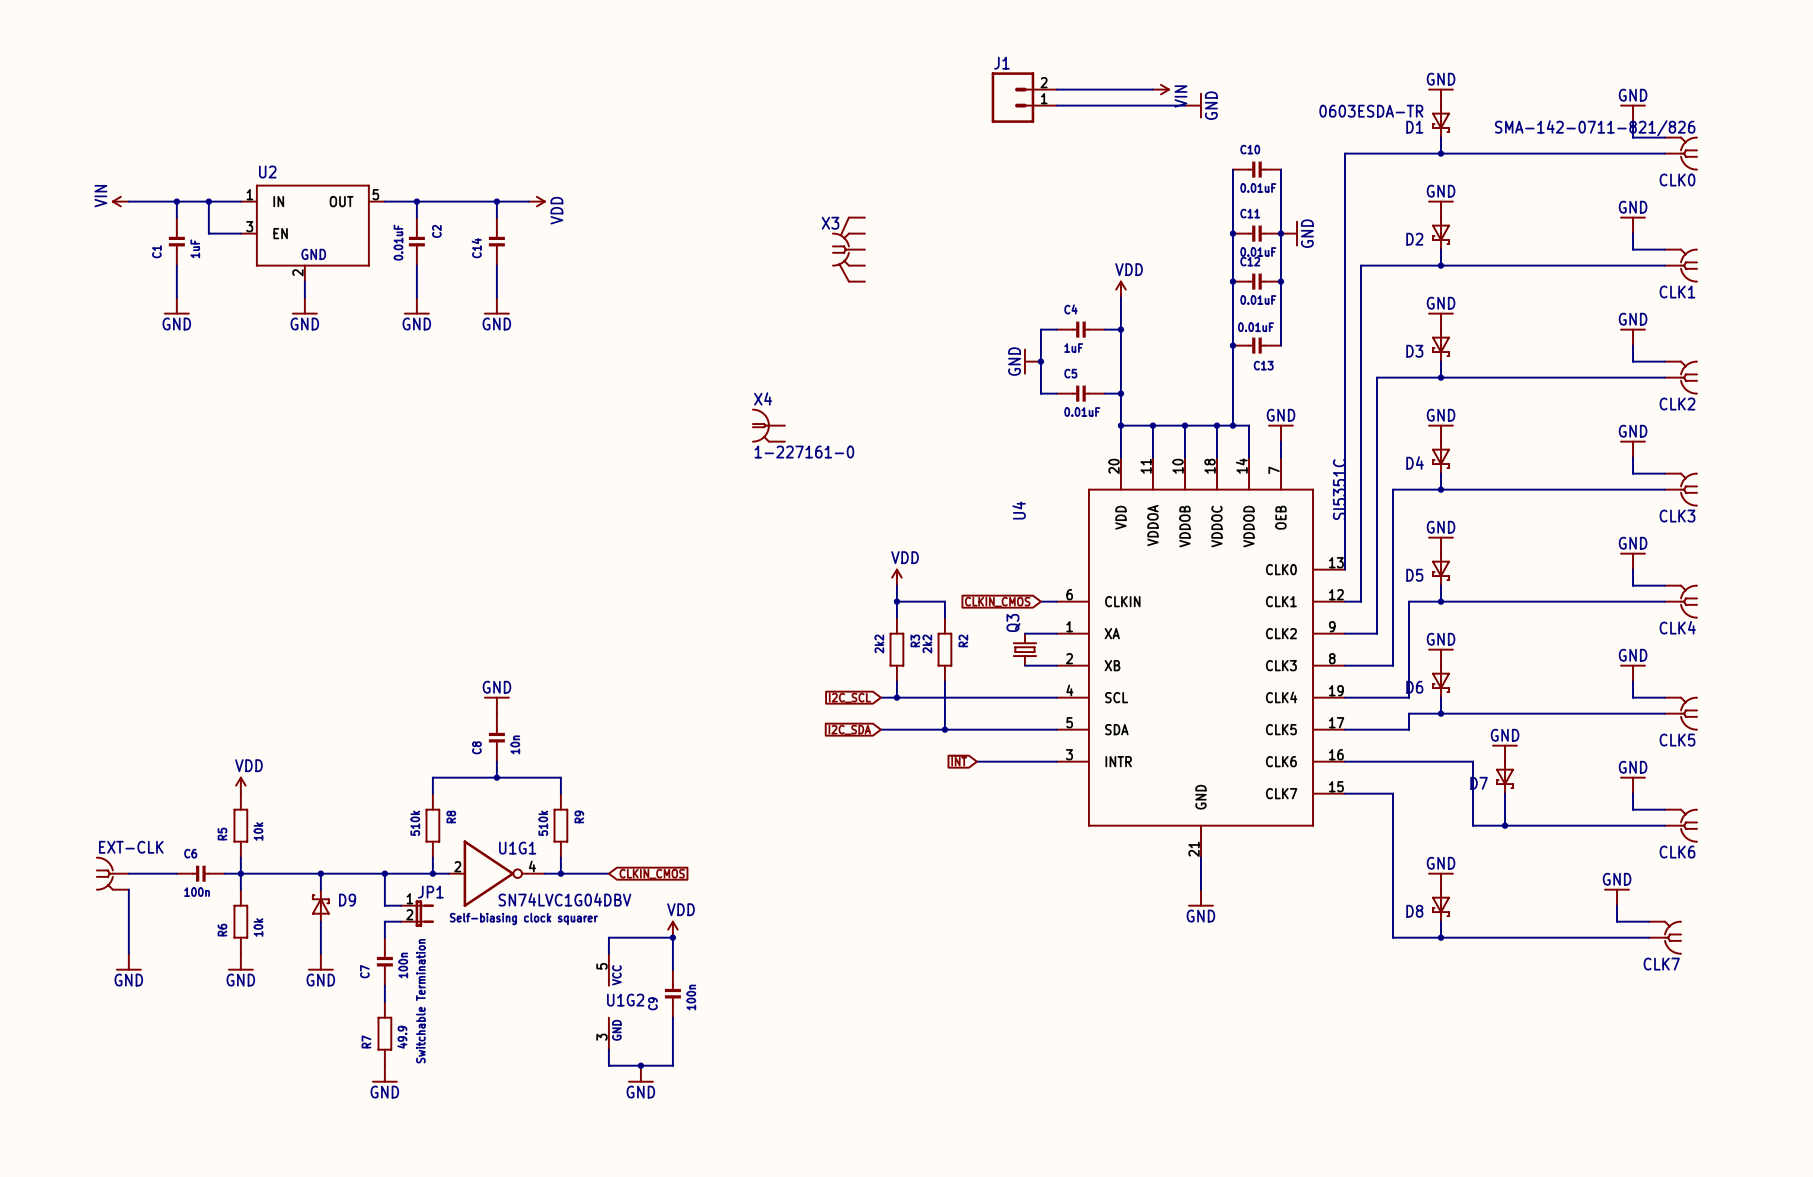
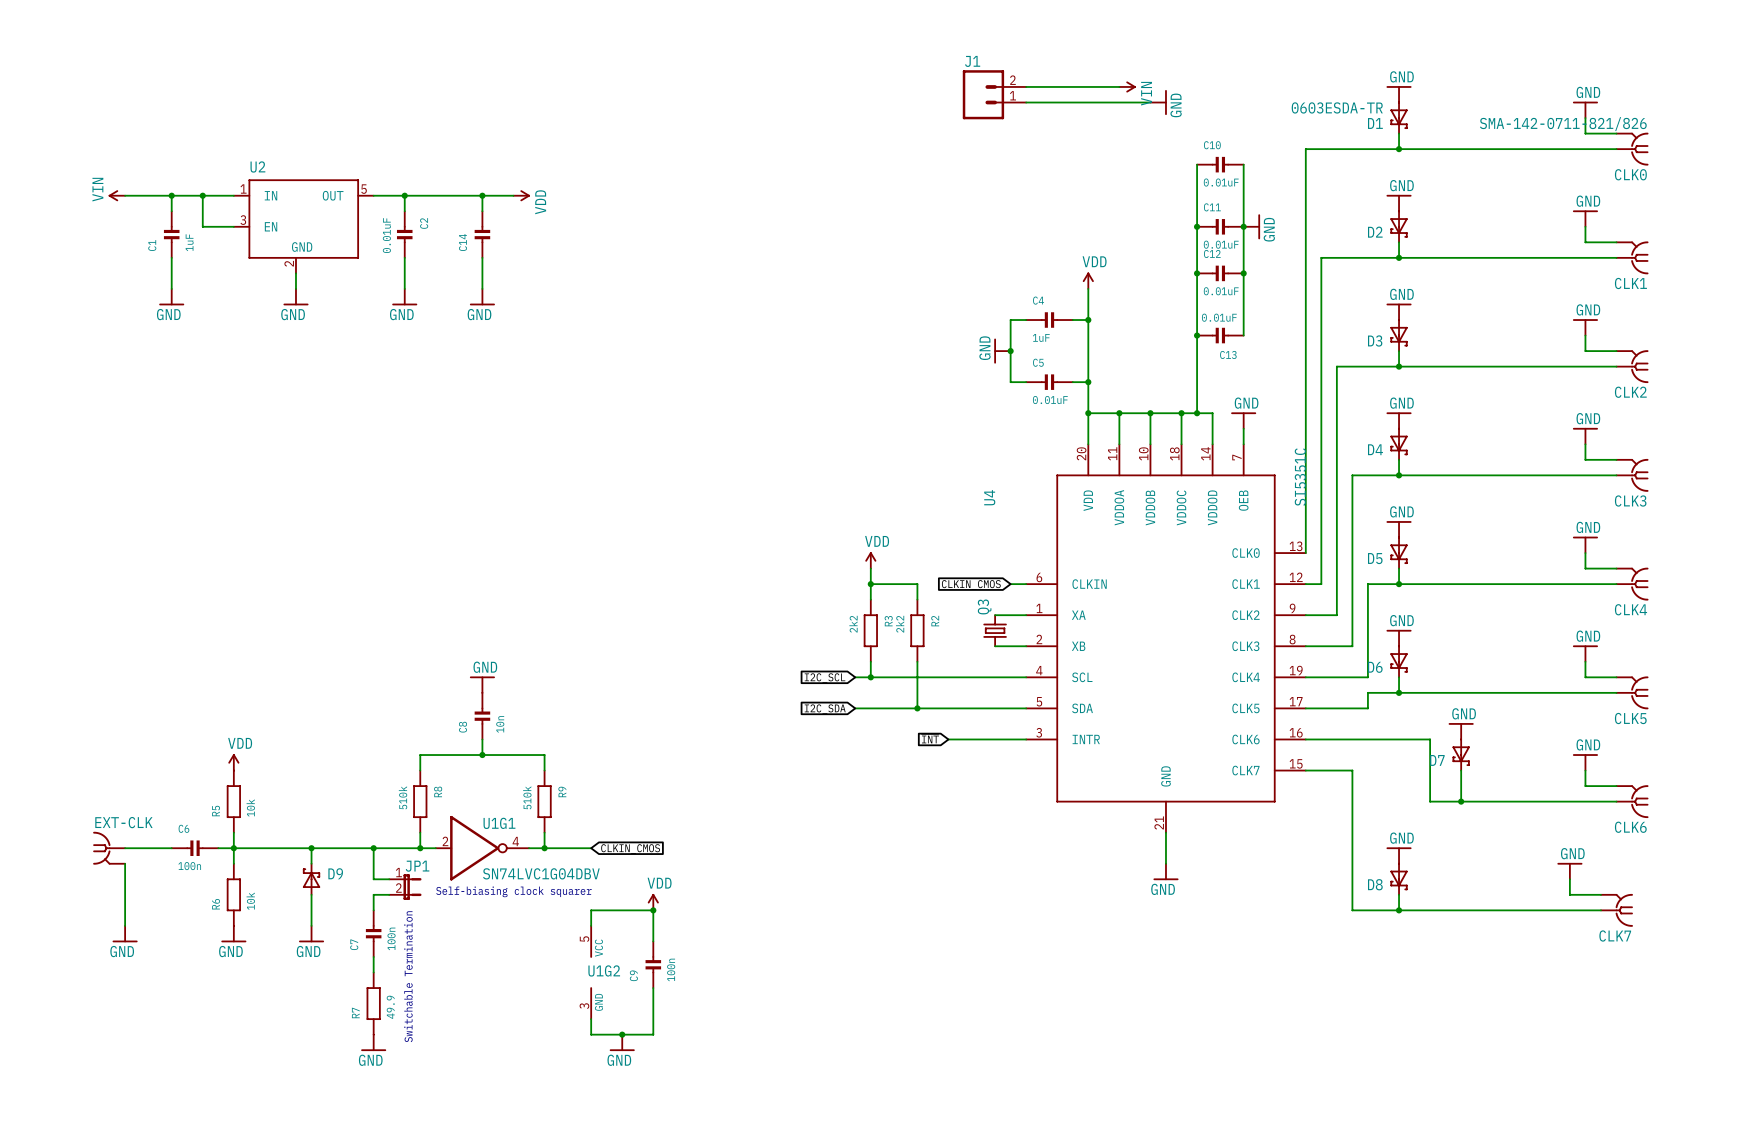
X3: (848, 249) -> none
X4: 1-227161-0 (768, 425) -> none

